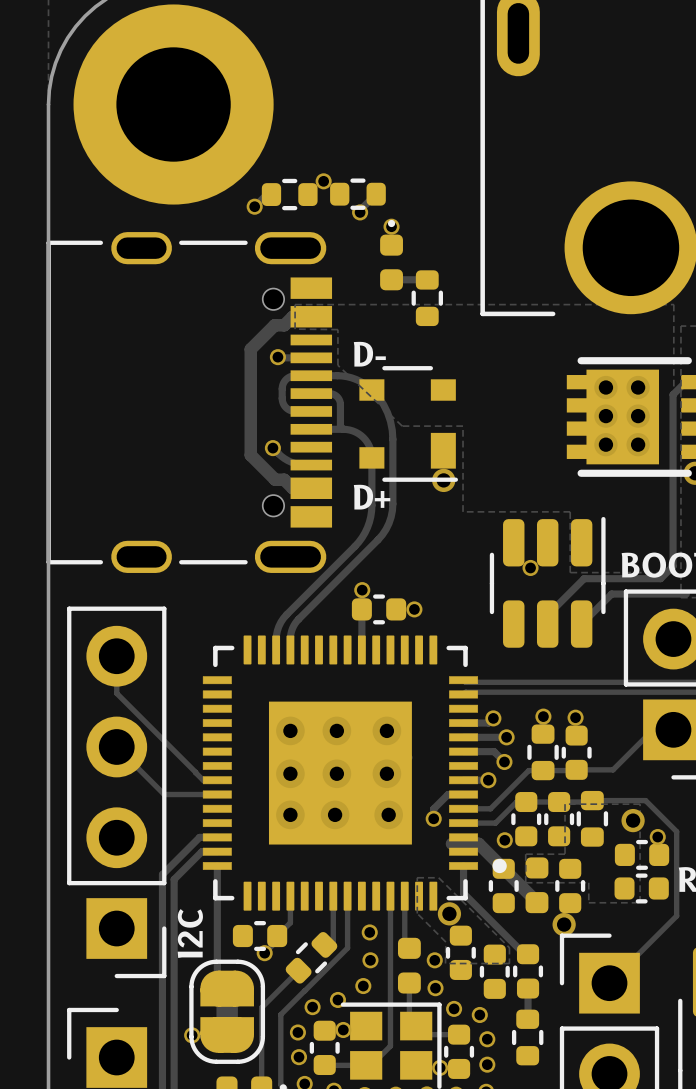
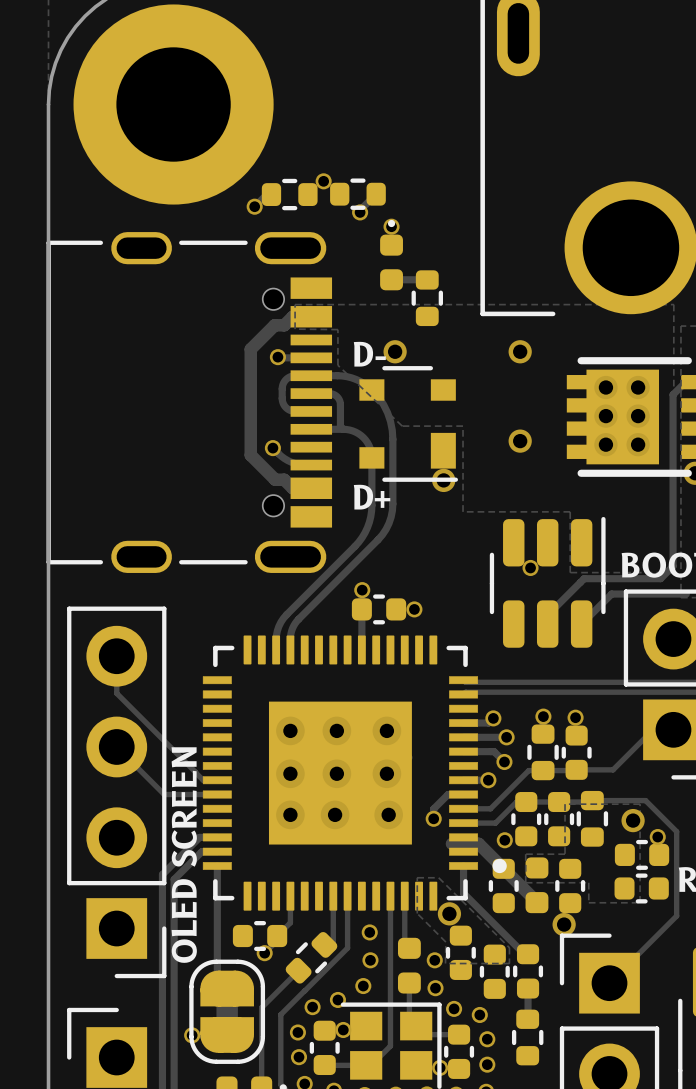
via: none -> (395, 351)
via: none -> (520, 351)
via: none -> (520, 441)
text: I2C (190, 933) -> OLED SCREEN (184, 855)

